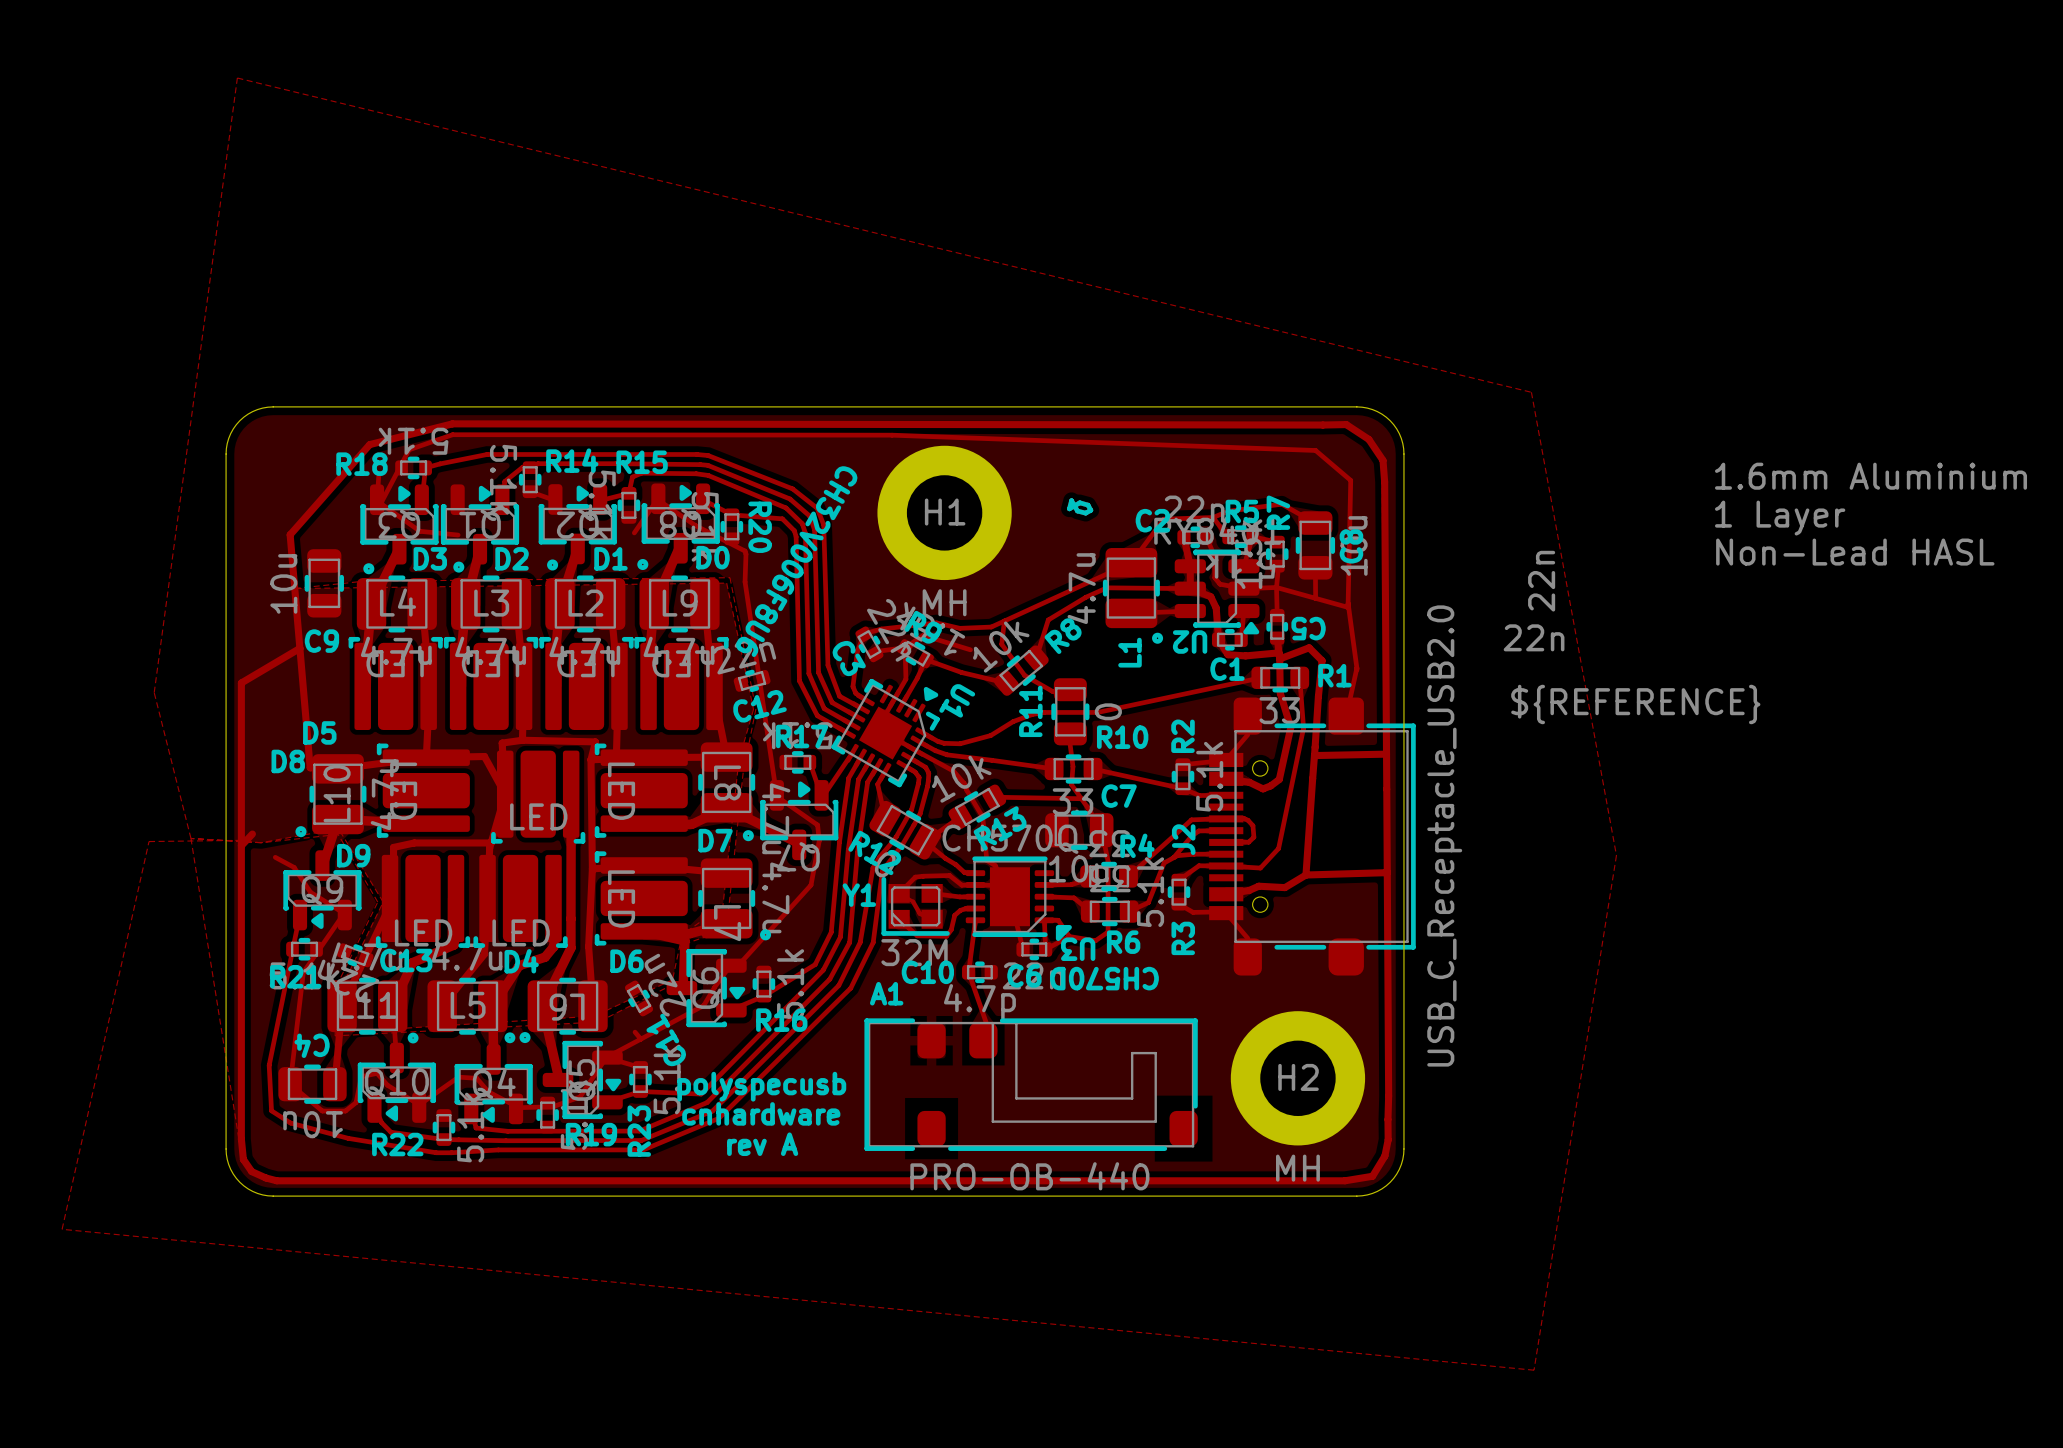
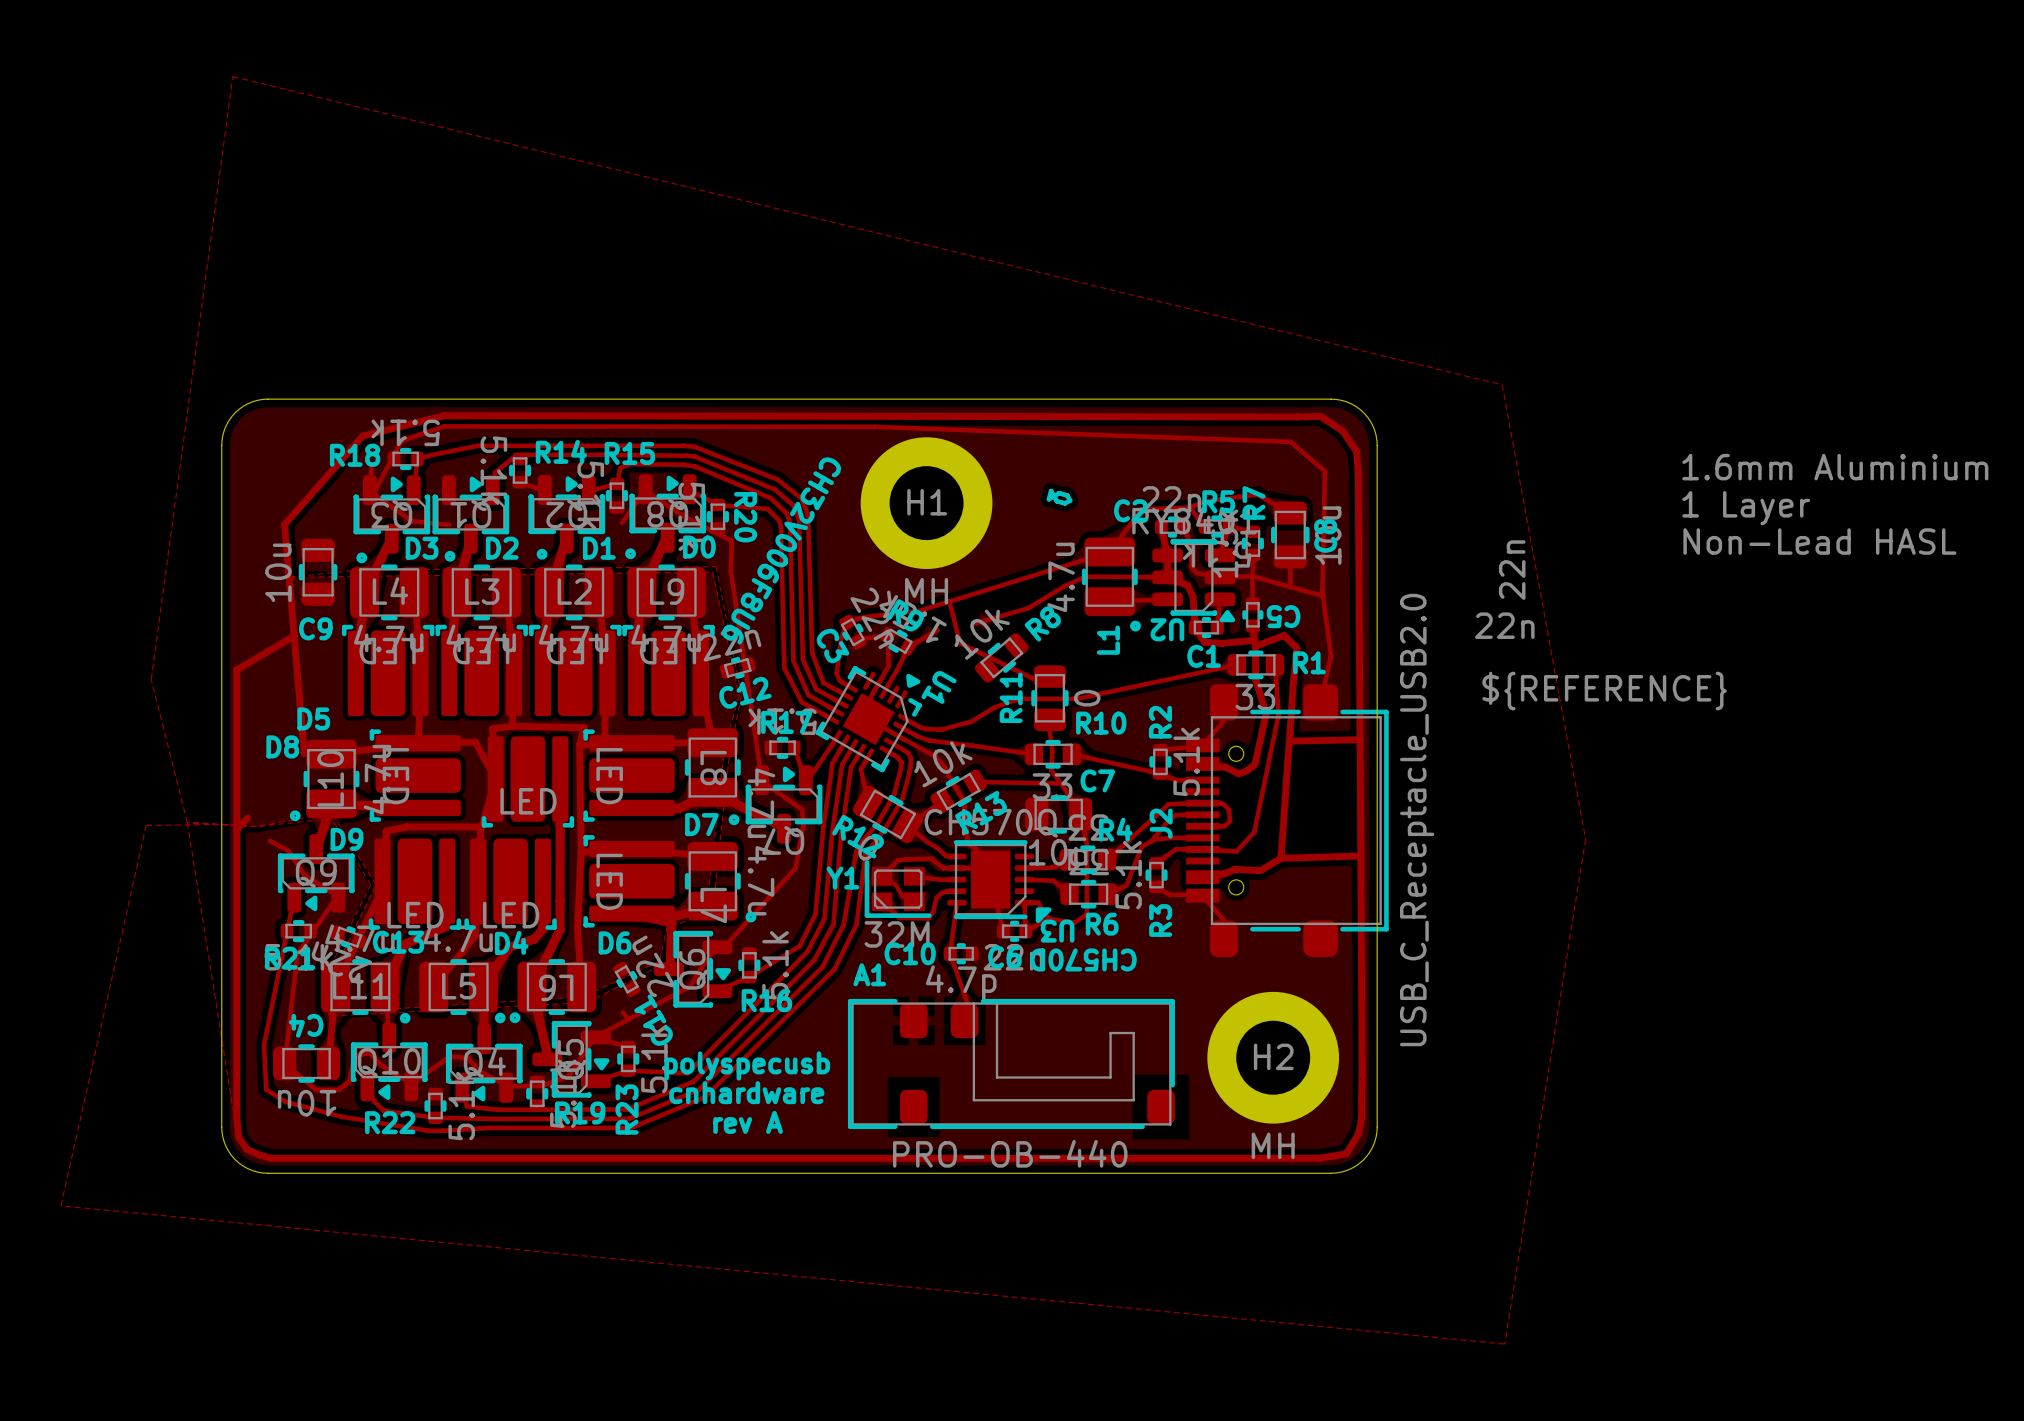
top track: (1131, 562) (991, 627) (959, 628) (936, 622) -> (1109, 552) (918, 611)
top track: (1048, 619) (1036, 658) -> (1028, 608) (975, 623)
top track: (1004, 621) (1001, 644) (1024, 675) (1052, 691) -> (949, 601) (960, 643) (1032, 678)
top track: (905, 647) (923, 635) (970, 649) -> none
top track: (925, 659) (961, 672) (1006, 683) -> (908, 647) (937, 630)

